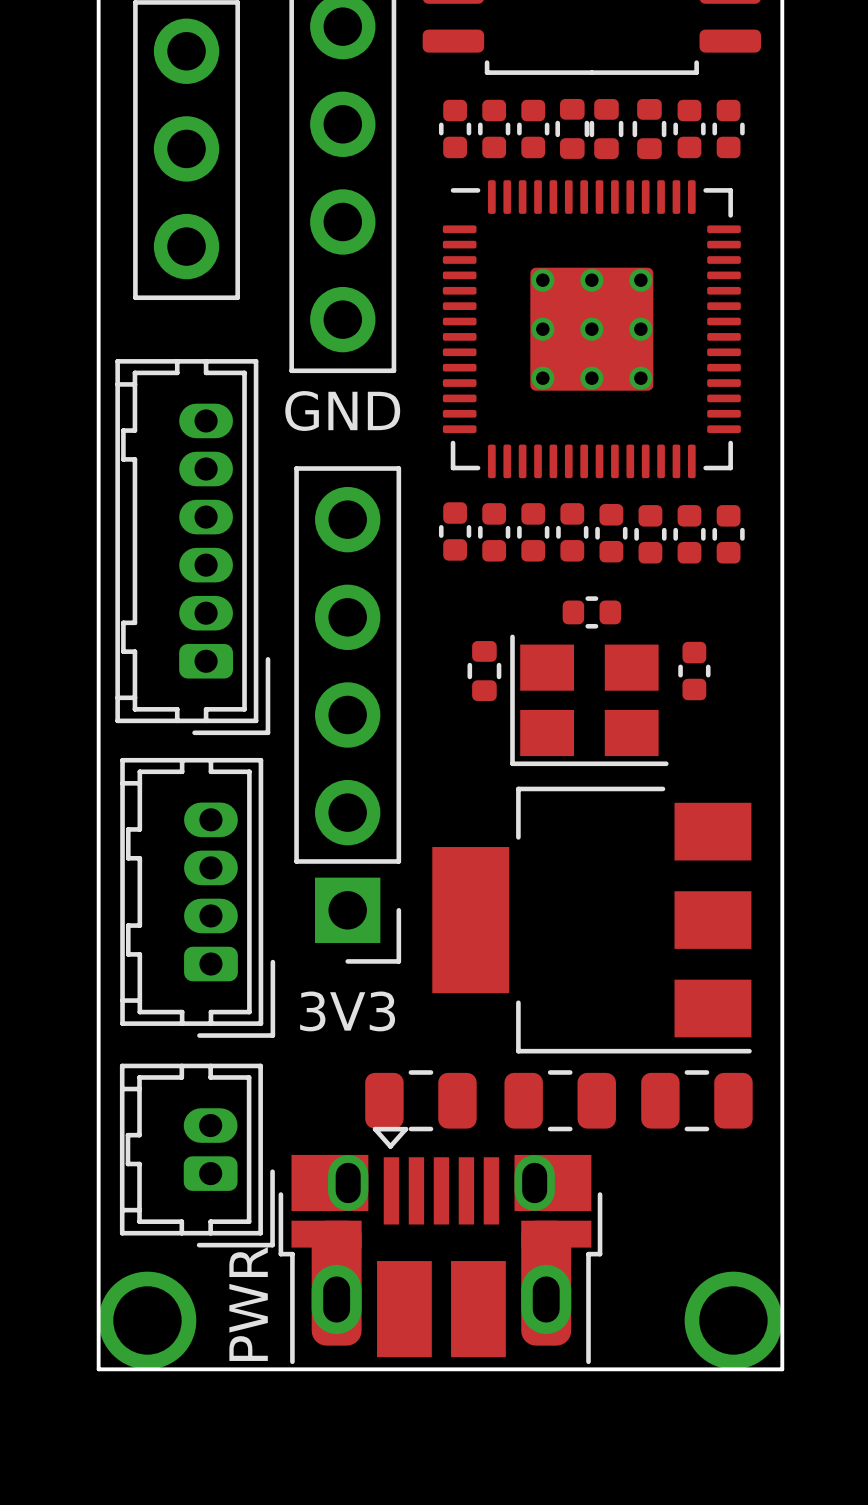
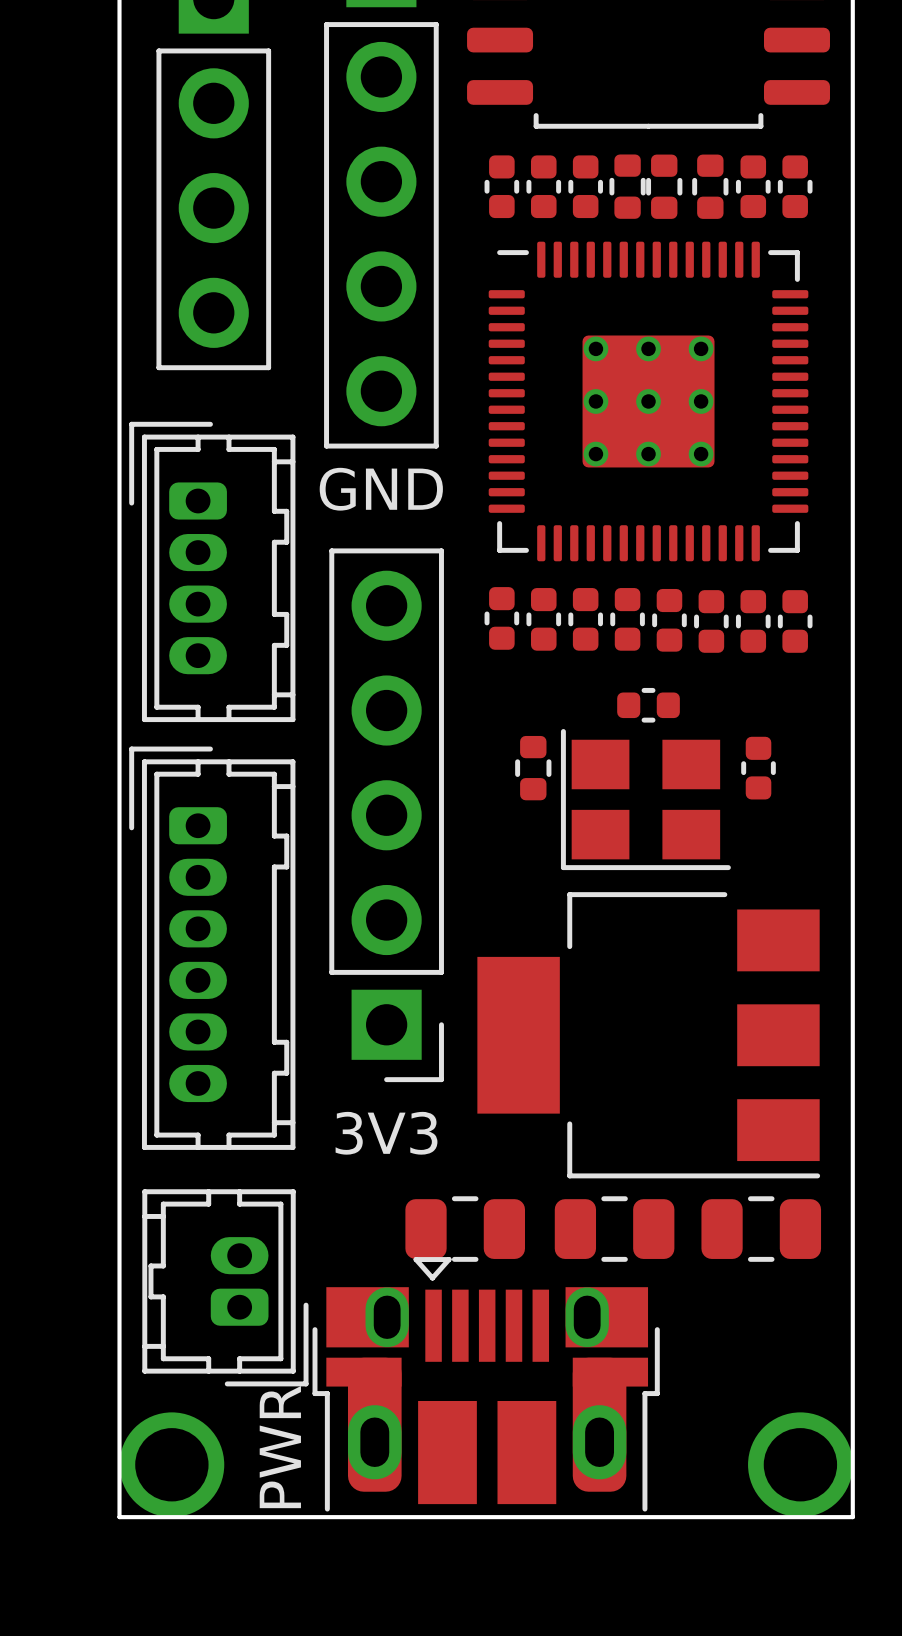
part rotation: 0° (192, 547) -> 180° (212, 948)
part position: (192, 547) -> (212, 948)
part rotation: 0° (197, 897) -> 180° (212, 571)
part position: (197, 897) -> (212, 571)

